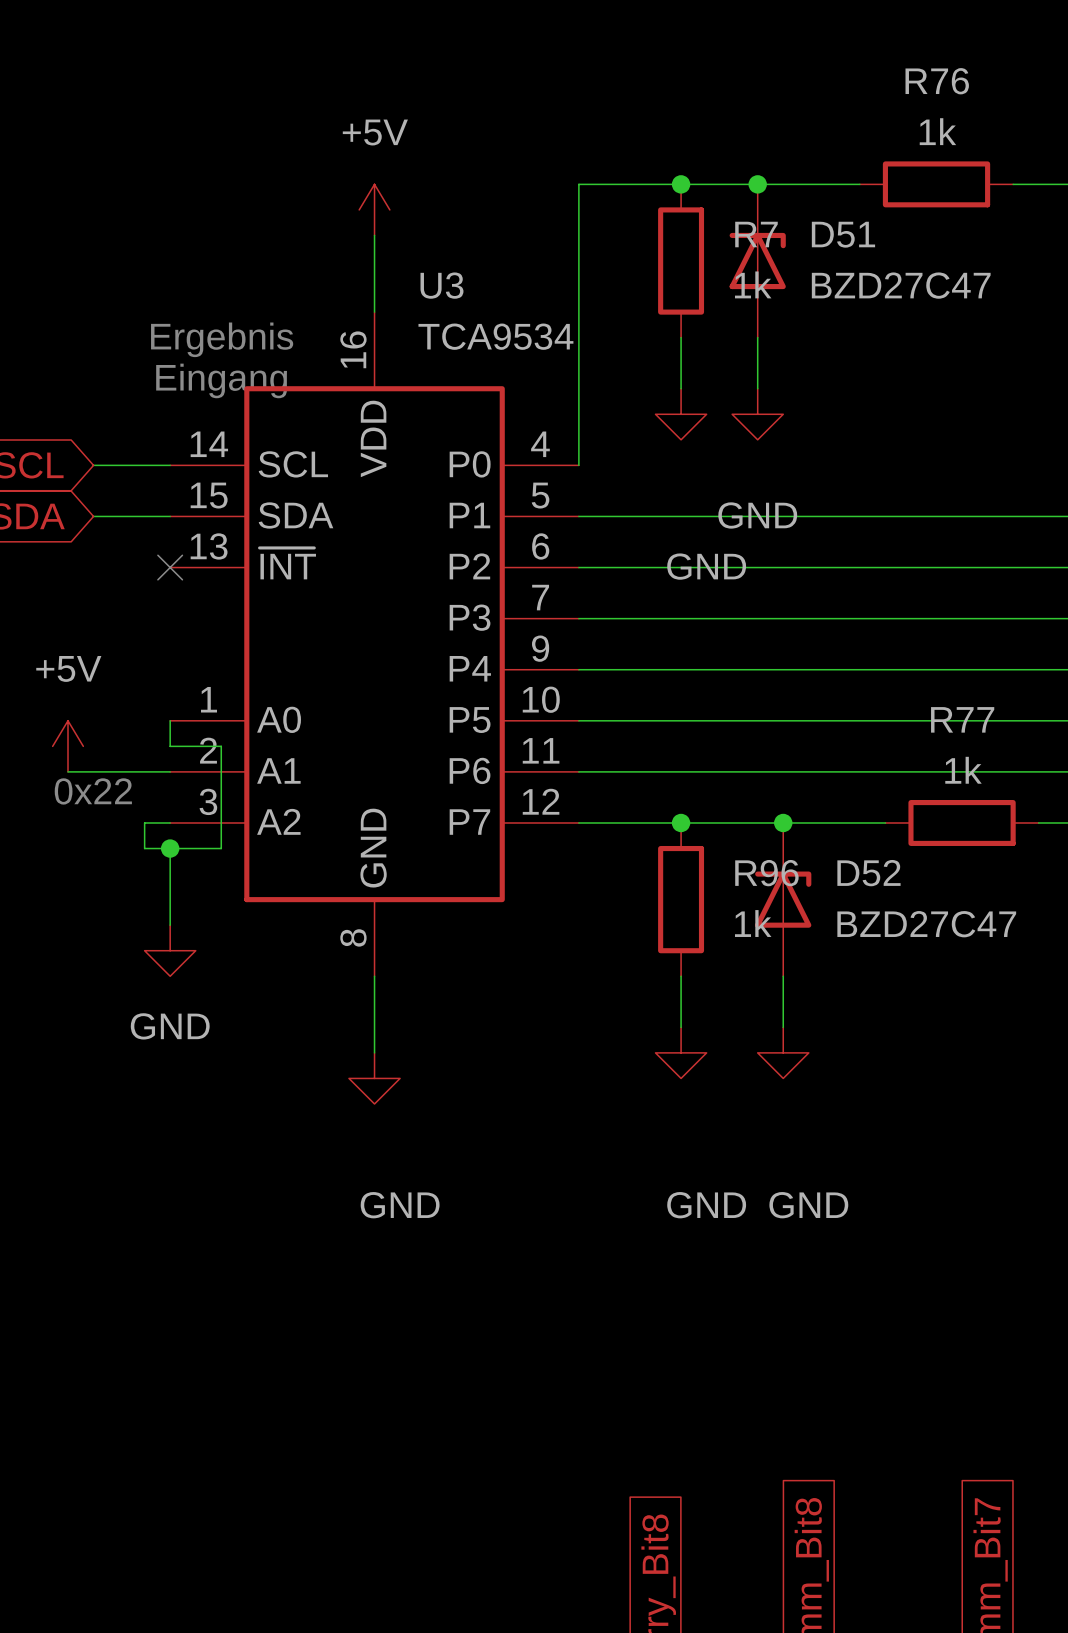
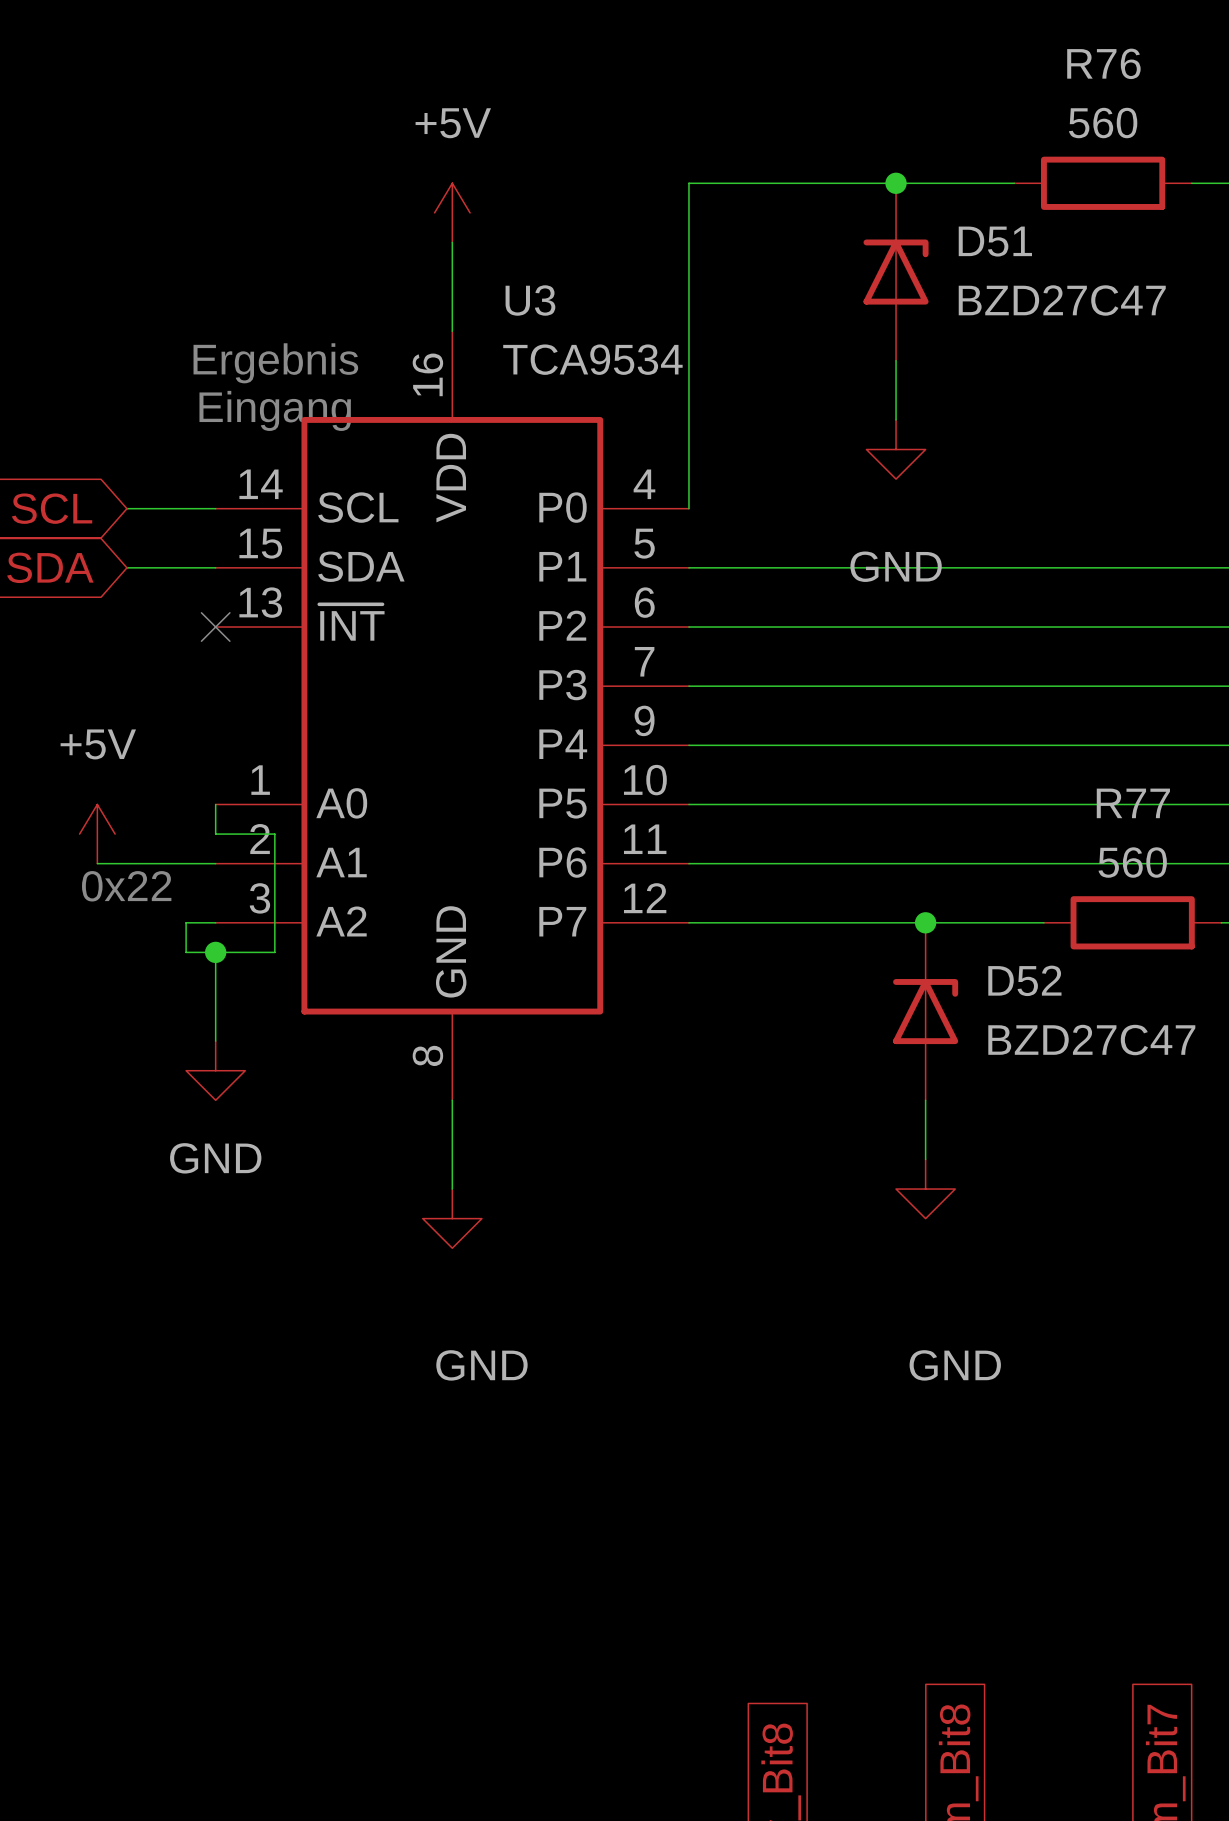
R76 value: 1k (937, 131) -> 560 (1103, 123)
junction: (681, 184) -> none
R7: 1k (681, 261) -> none
wire: (681, 337) (681, 388) -> none
power symbol: GND (681, 414) -> none
R77 value: 1k (963, 770) -> 560 (1132, 862)
junction: (681, 822) -> none
R96: 1k (681, 899) -> none
wire: (681, 976) (681, 1027) -> none
power symbol: GND (681, 1052) -> none

